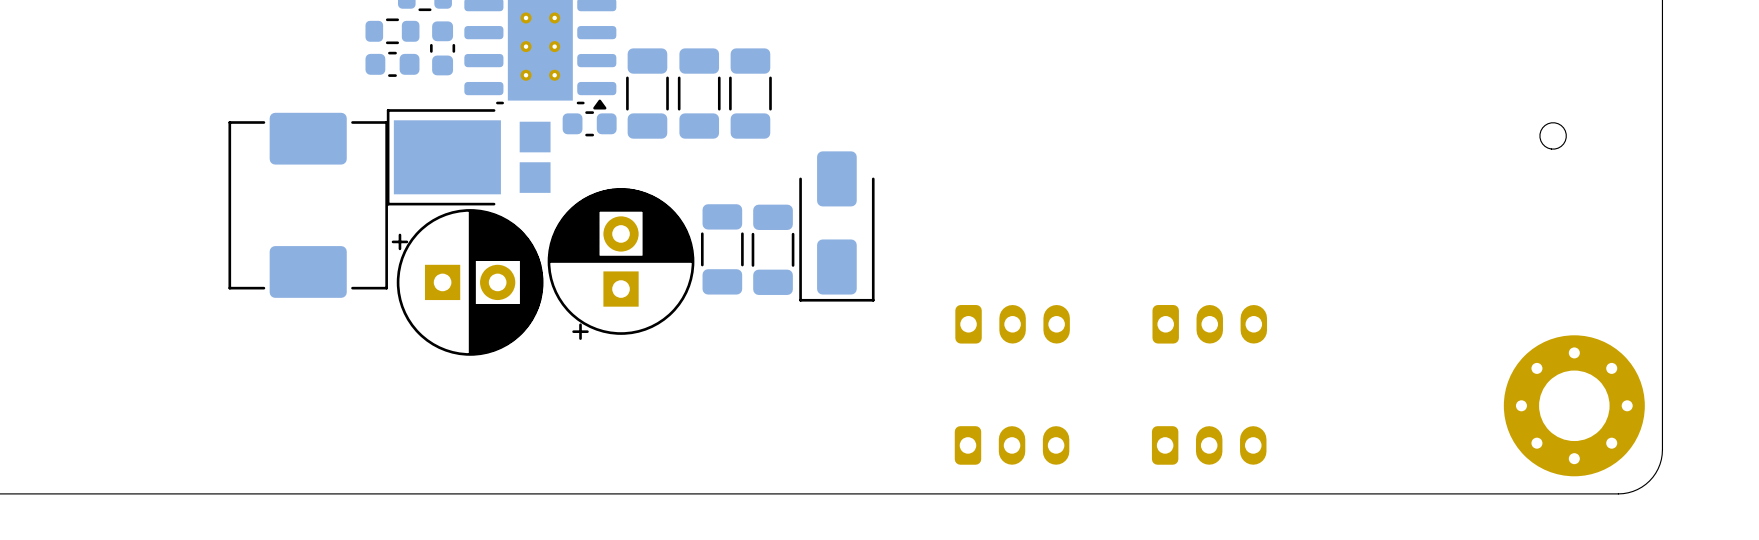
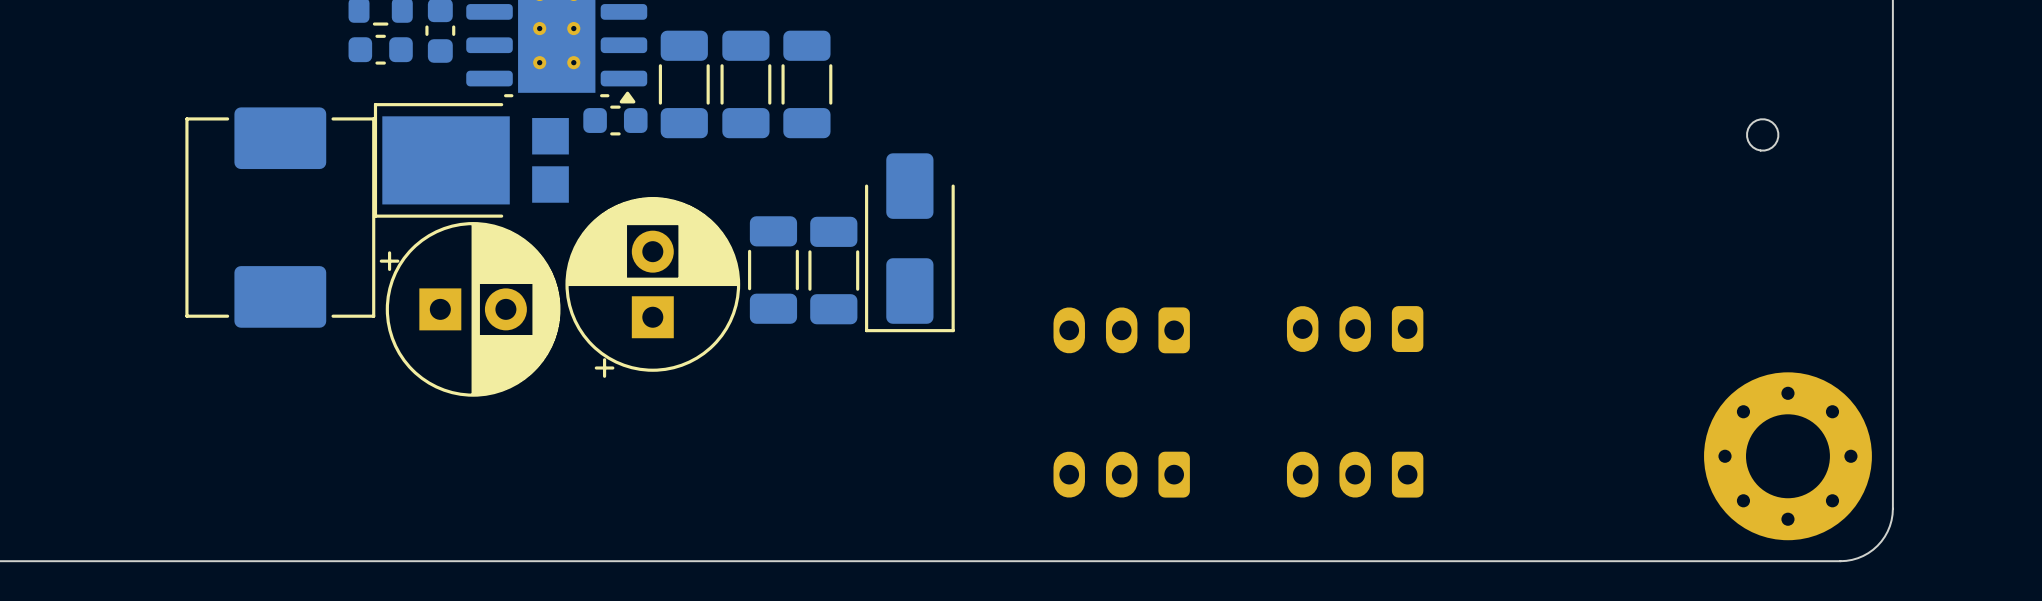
part rotation: 0° (1012, 324) -> 180° (1121, 330)
part rotation: 0° (1209, 324) -> 180° (1355, 329)
part rotation: 0° (1012, 445) -> 180° (1121, 474)
part rotation: 0° (1209, 445) -> 180° (1355, 474)

